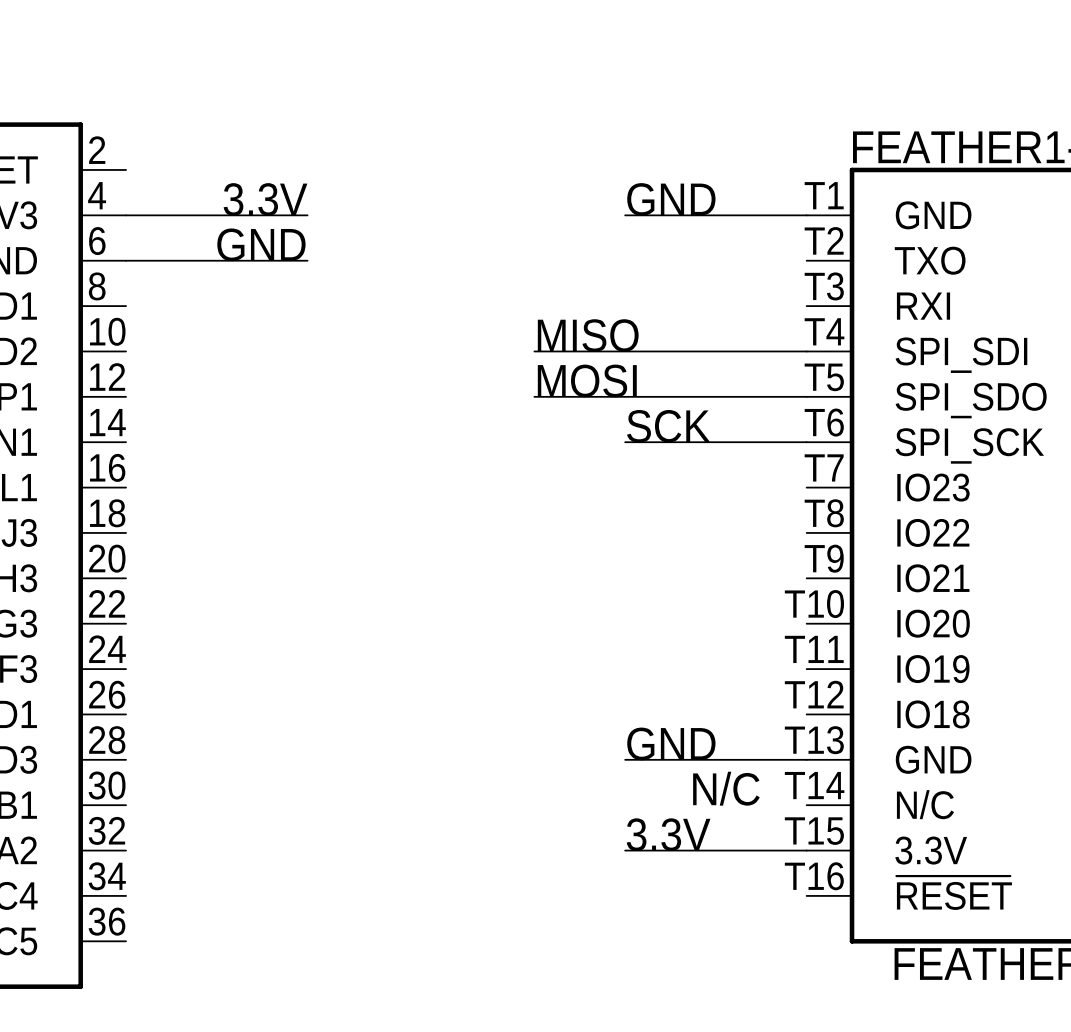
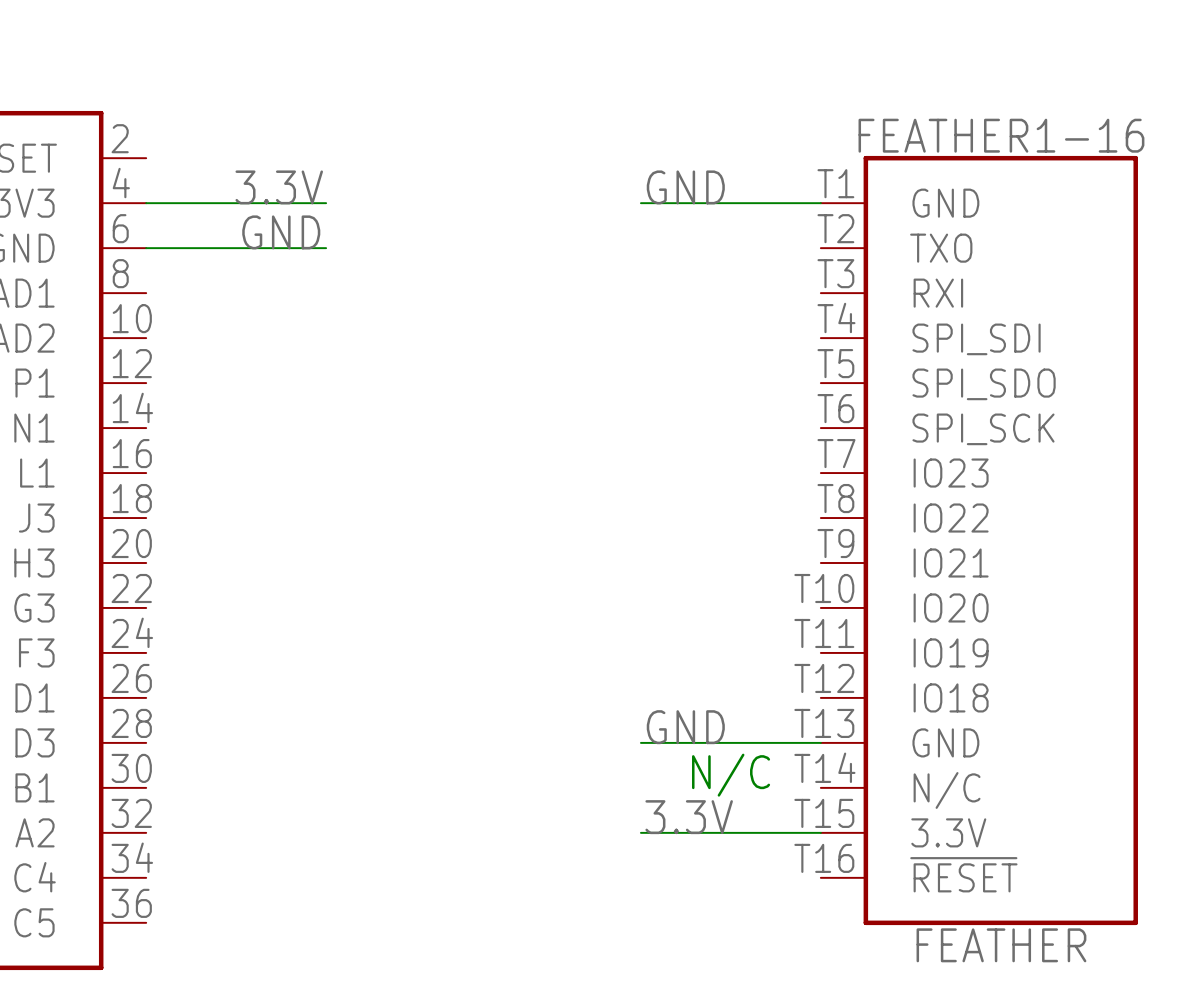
label: MISO (588, 335) -> none
wire: (534, 351) (806, 351) -> none
label: MOSI (587, 380) -> none
wire: (534, 396) (806, 396) -> none
label: SCK (668, 426) -> none
wire: (625, 442) (806, 442) -> none

